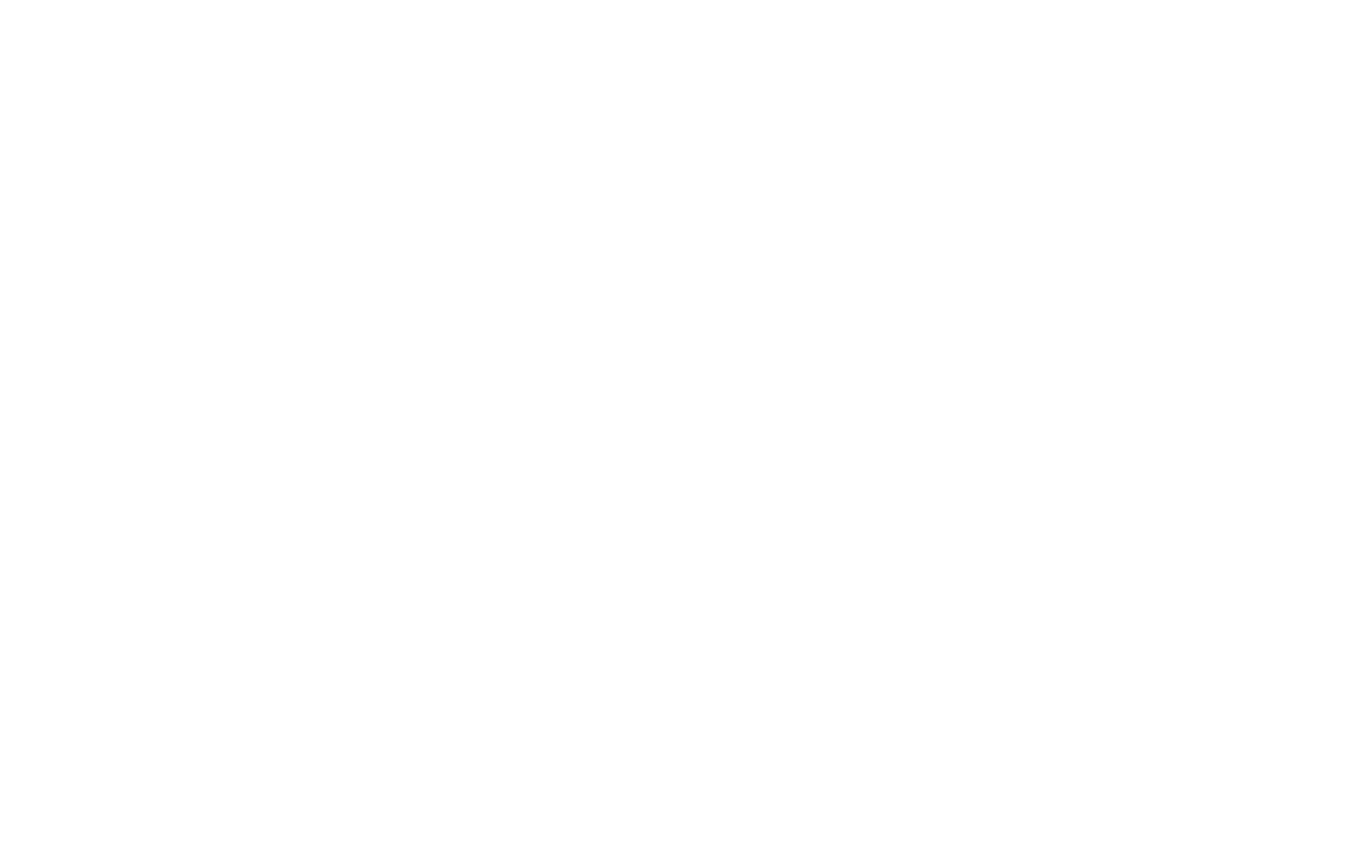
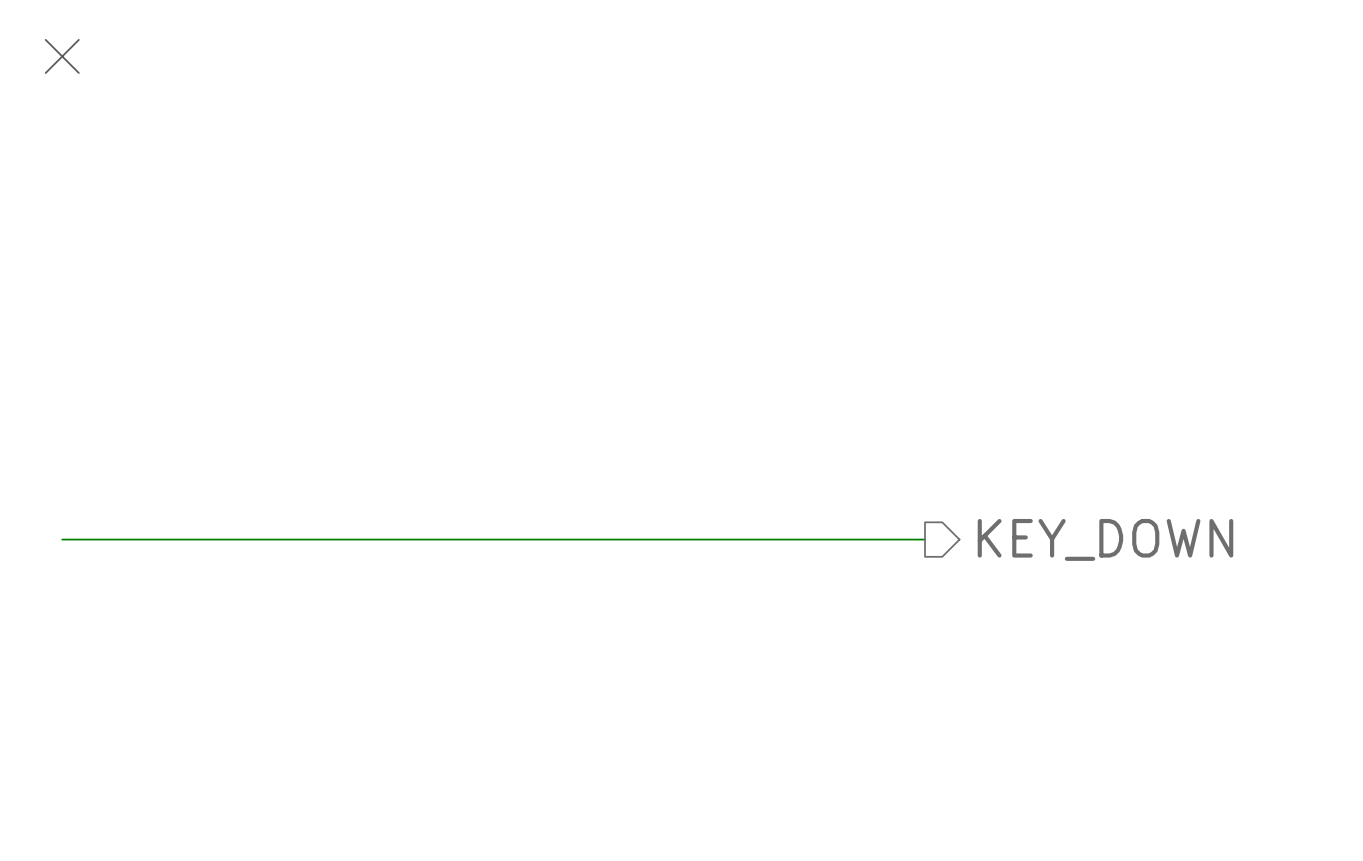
no-connect mark: none -> (62, 56)
wire: none -> (62, 539) (925, 539)
hierarchical label: none -> KEY_DOWN (1105, 539)

